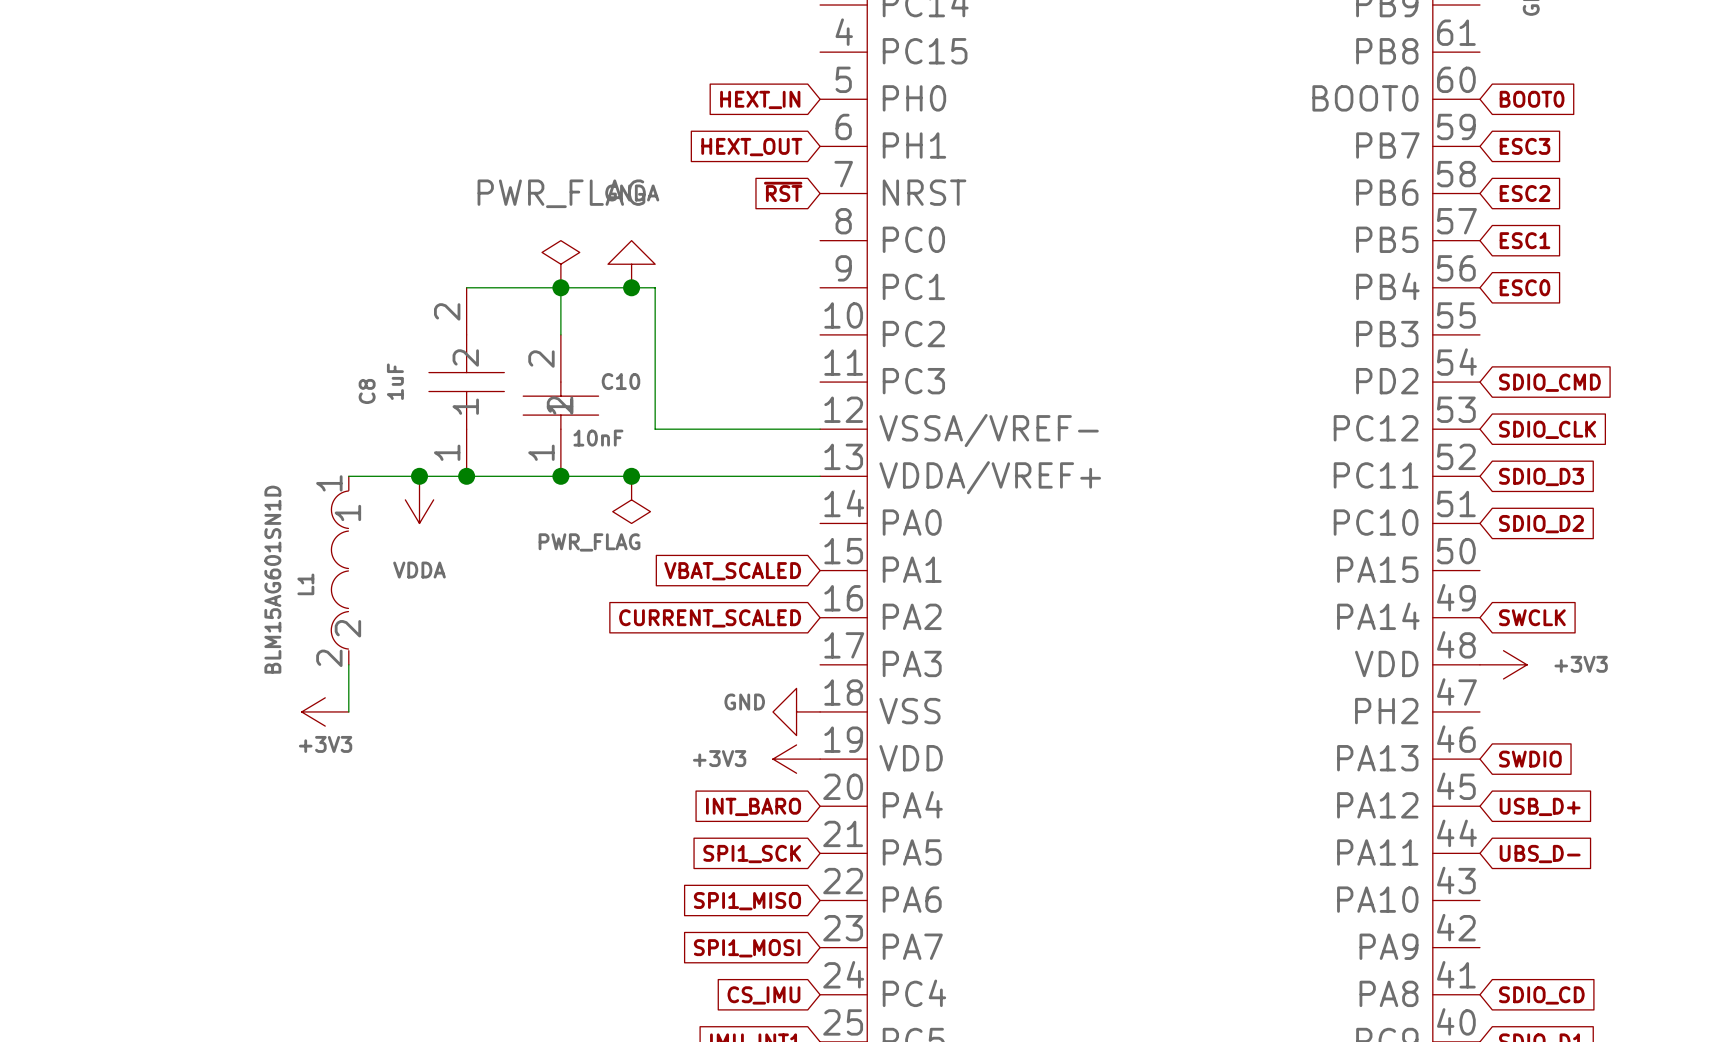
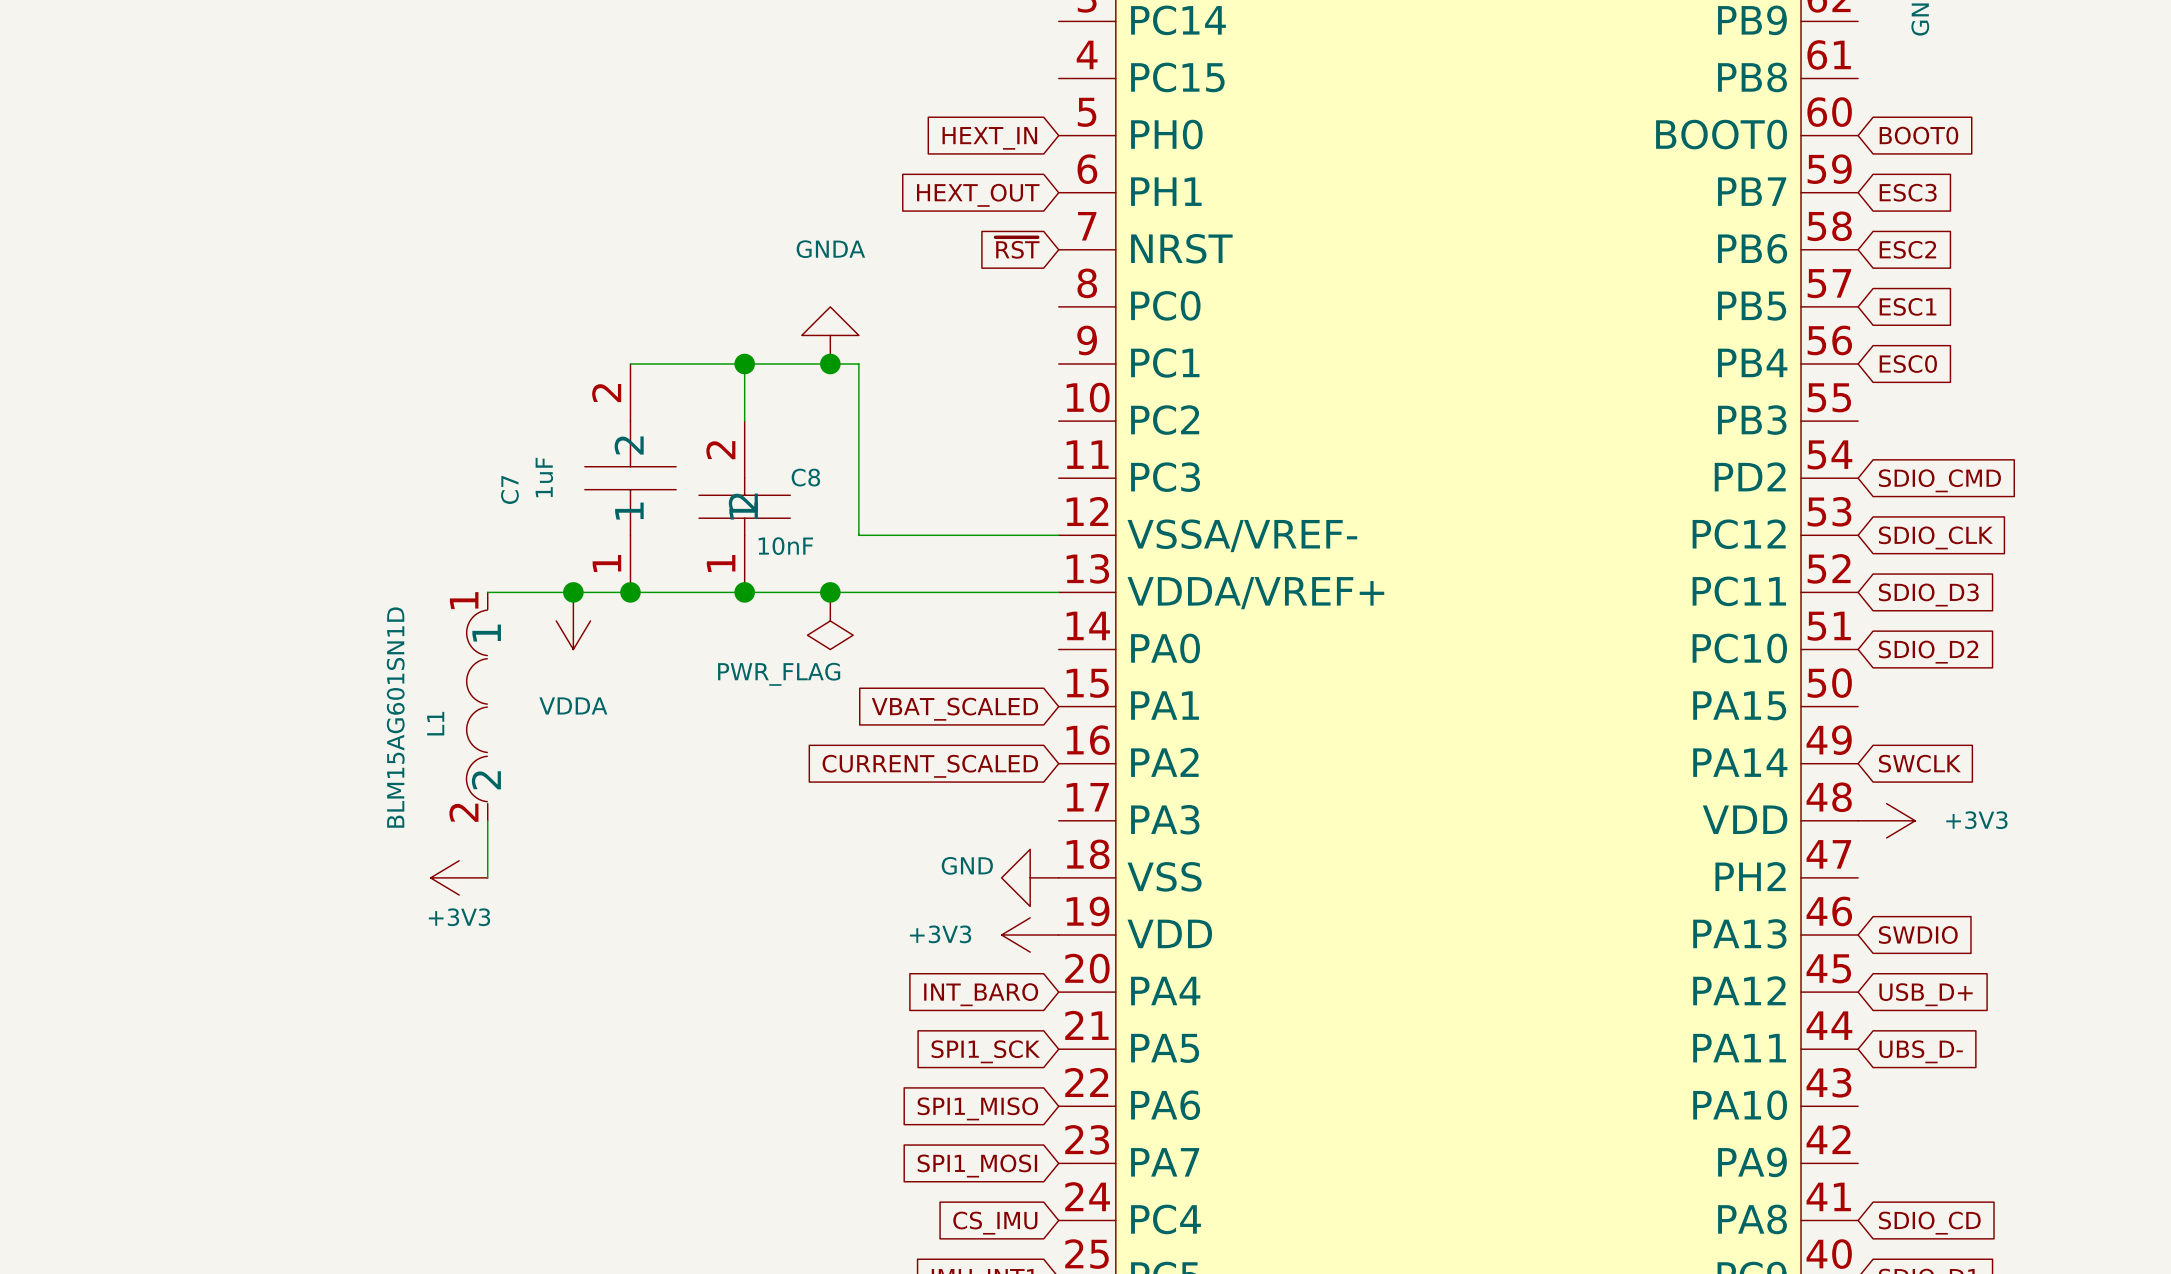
power symbol: PWR_FLAG (560, 264) -> none
C10 name: C10 (620, 381) -> C8 (805, 477)
C8 name: C8 (367, 391) -> C7 (509, 489)

